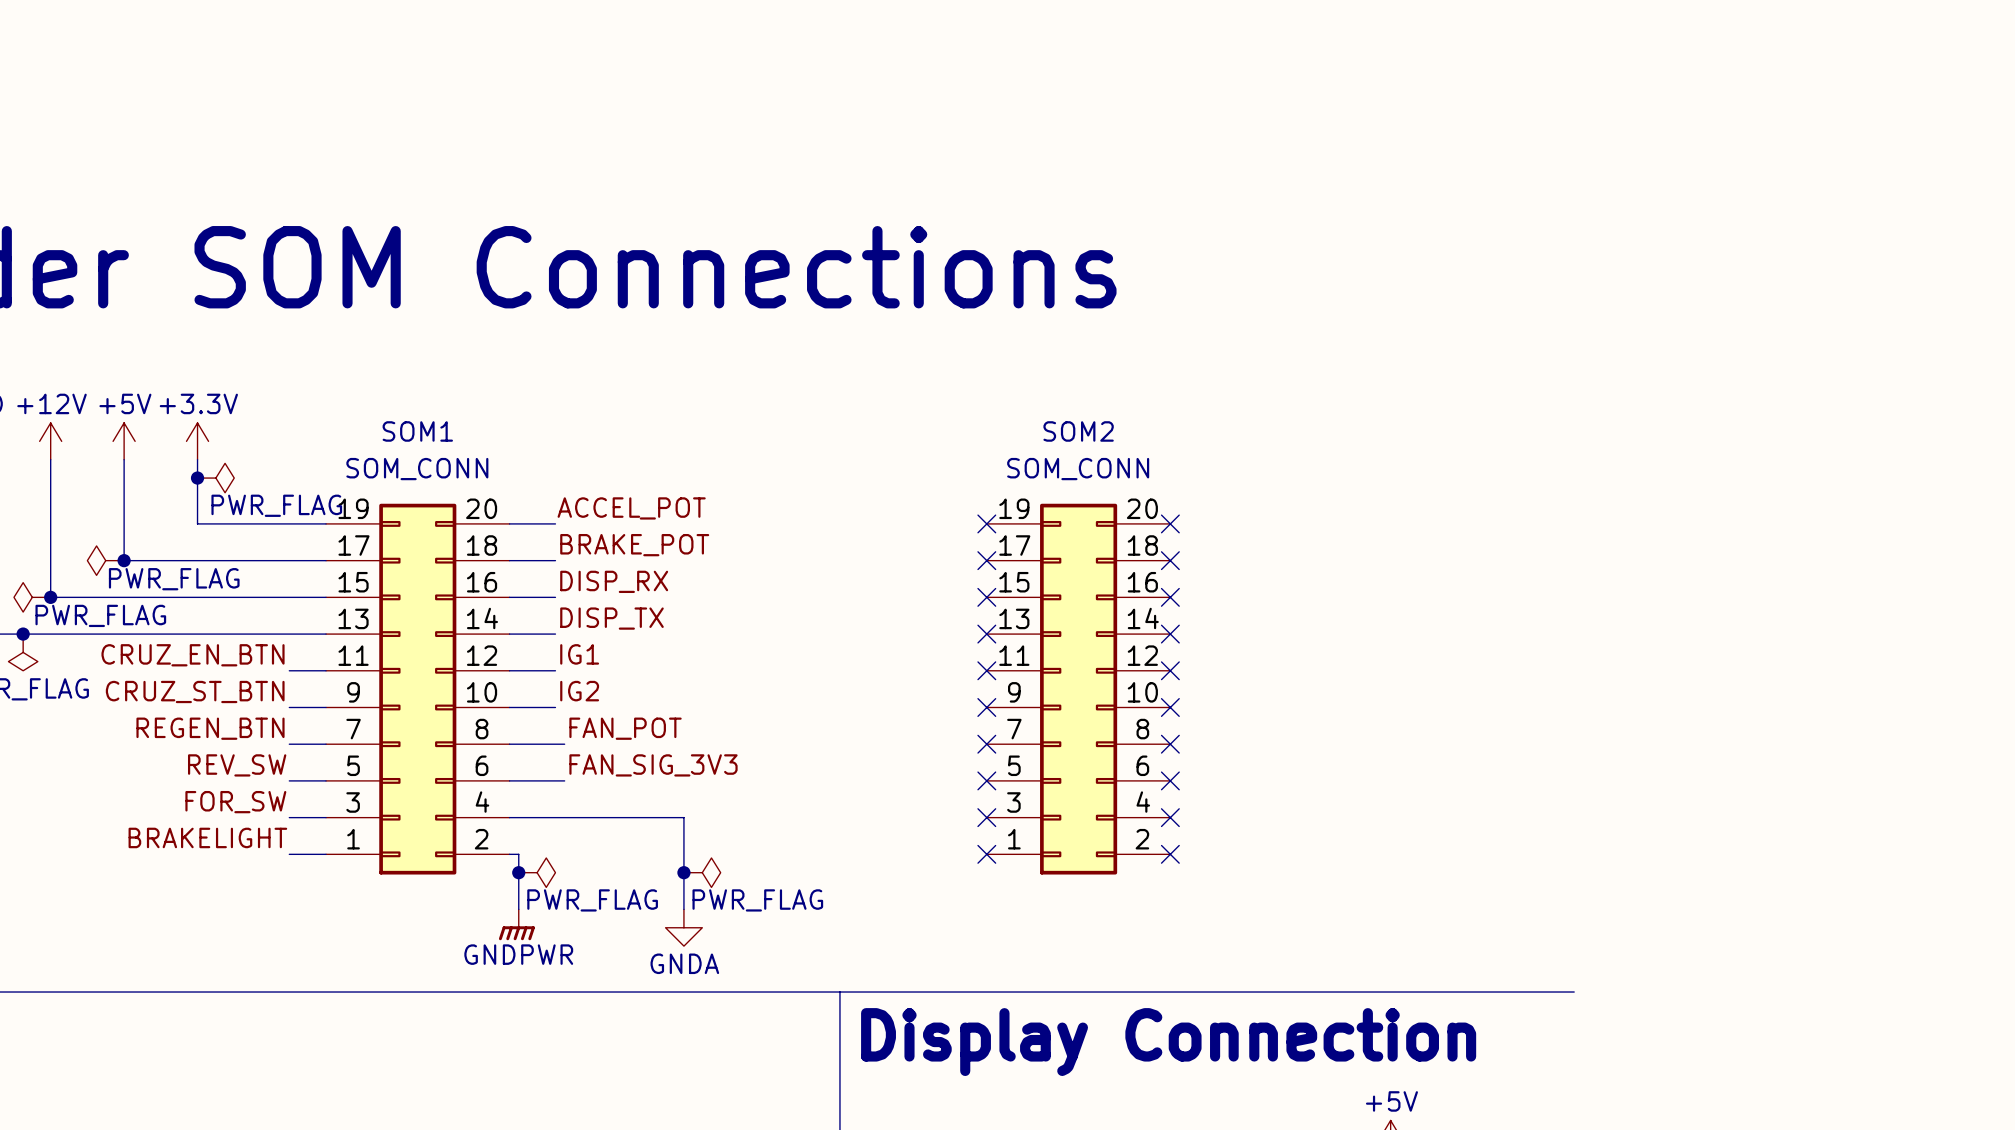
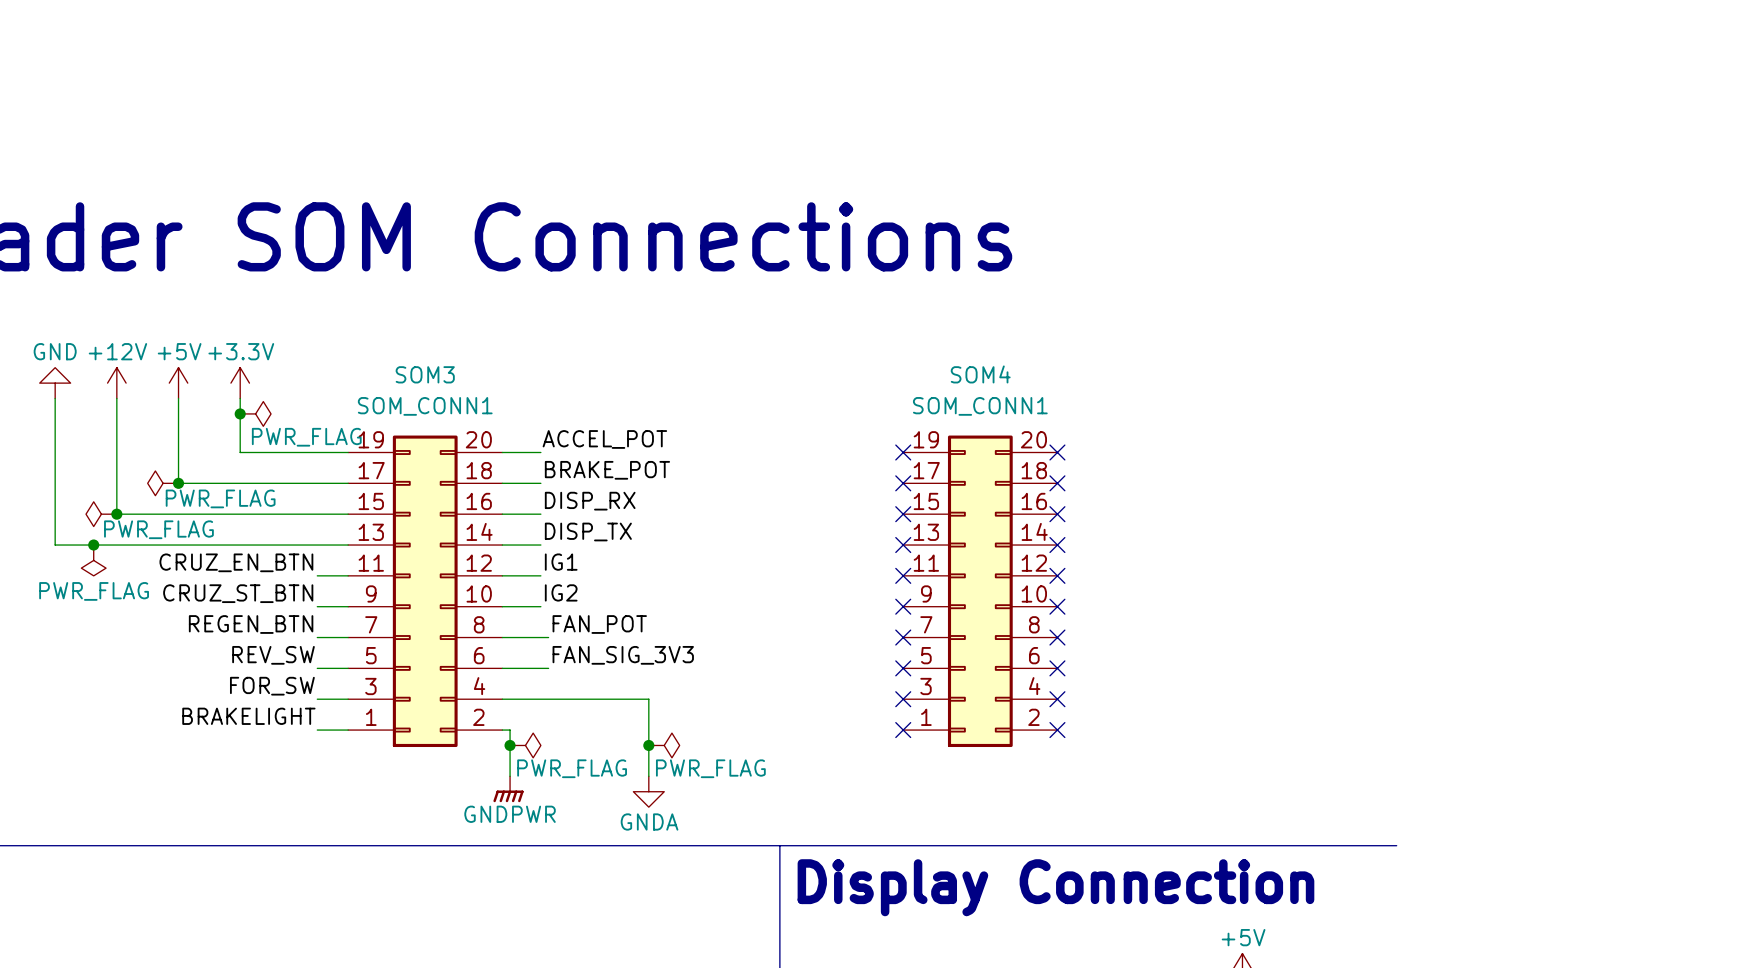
SOM1 name: SOM1 (417, 431) -> SOM3 (425, 374)
SOM2 name: SOM2 (1078, 431) -> SOM4 (980, 374)
SOM1 value: SOM_CONN (417, 469) -> SOM_CONN1 (425, 406)
SOM2 value: SOM_CONN (1078, 469) -> SOM_CONN1 (980, 406)

